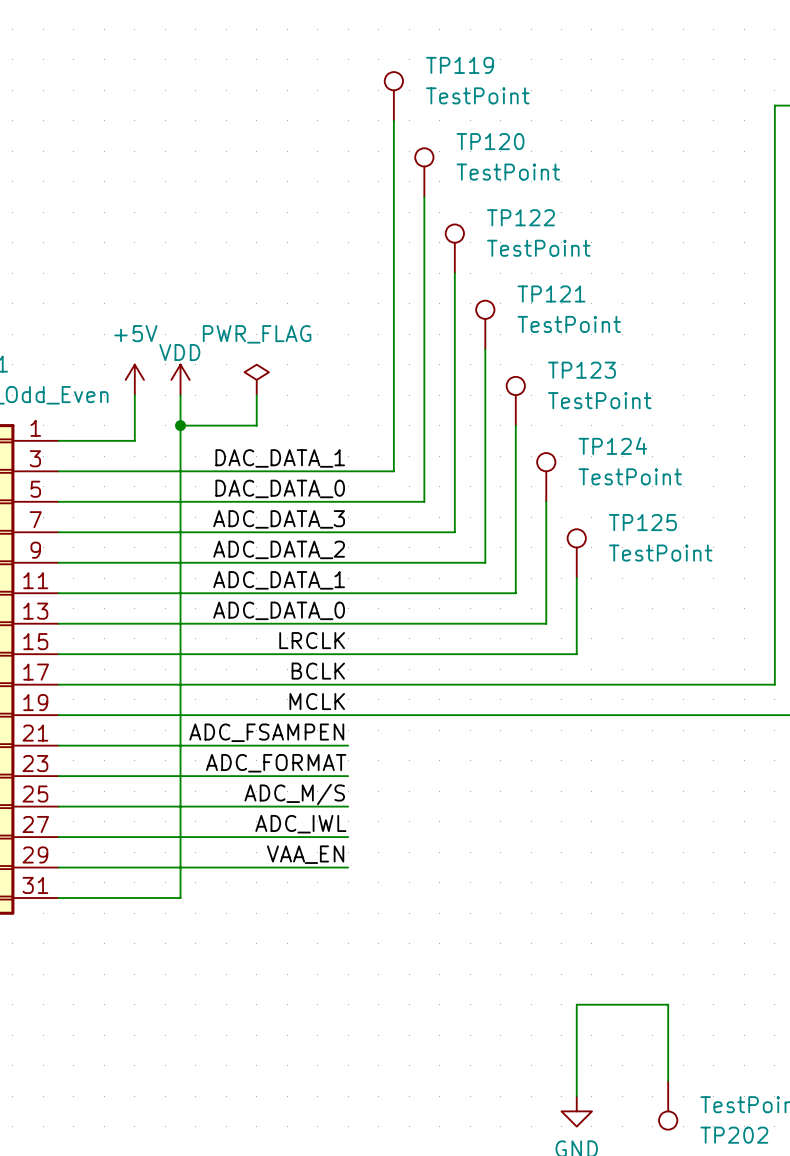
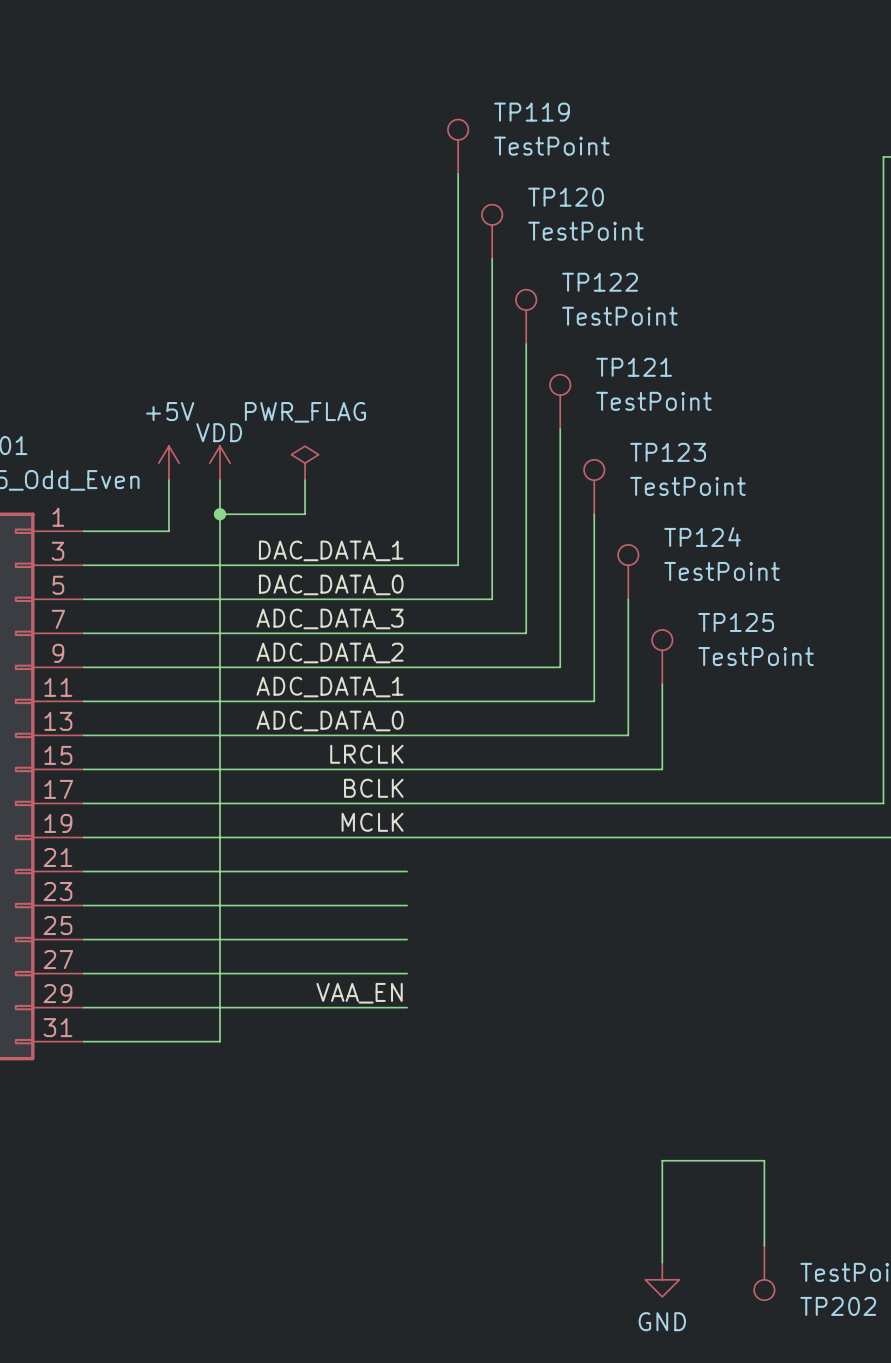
label: ADC_FSAMPEN (266, 732) -> none
label: ADC_FORMAT (276, 763) -> none
label: ADC_M/S (294, 794) -> none
label: ADC_IWL (300, 824) -> none

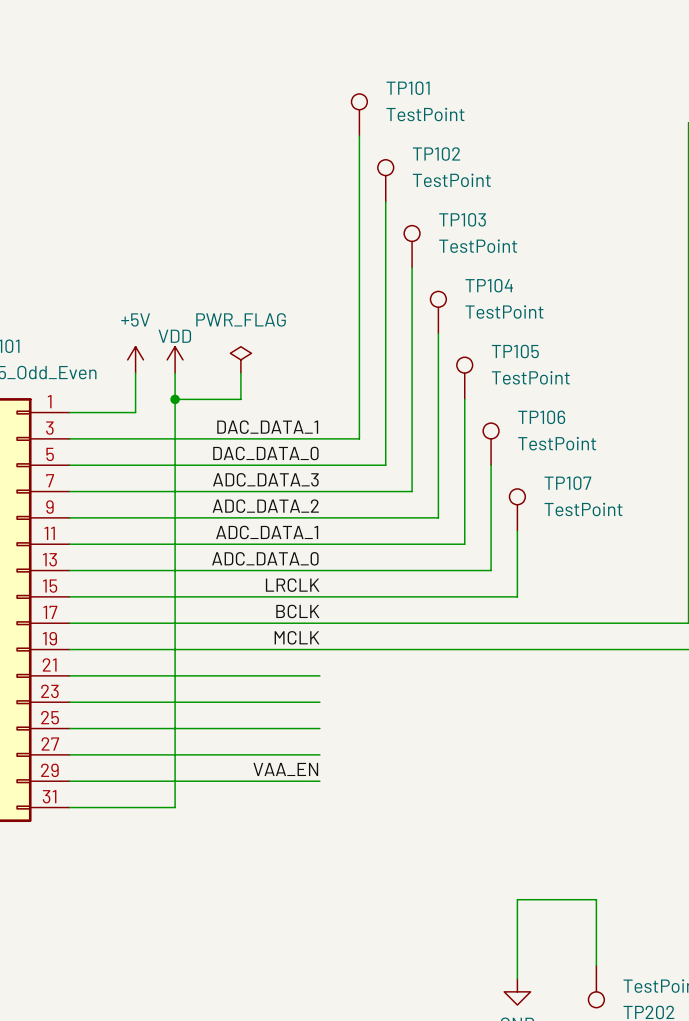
TP119 name: TP119 (532, 112) -> TP101 (408, 88)
TP120 name: TP120 (566, 197) -> TP102 (436, 154)
TP122 name: TP122 (600, 282) -> TP103 (462, 219)
TP121 name: TP121 (634, 367) -> TP104 (489, 285)
TP123 name: TP123 (668, 452) -> TP105 (515, 351)
TP124 name: TP124 (702, 537) -> TP106 (541, 417)
TP125 name: TP125 (736, 622) -> TP107 (567, 483)

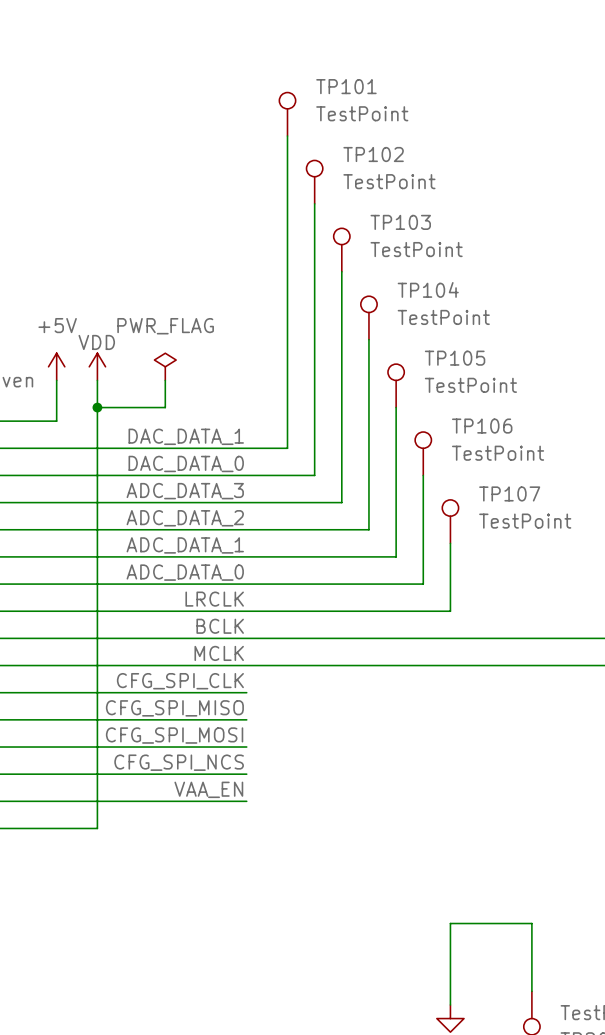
label: none -> CFG_SPI_CLK (180, 681)
label: none -> CFG_SPI_MISO (174, 708)
label: none -> CFG_SPI_MOSI (174, 735)
label: none -> CFG_SPI_NCS (179, 762)

